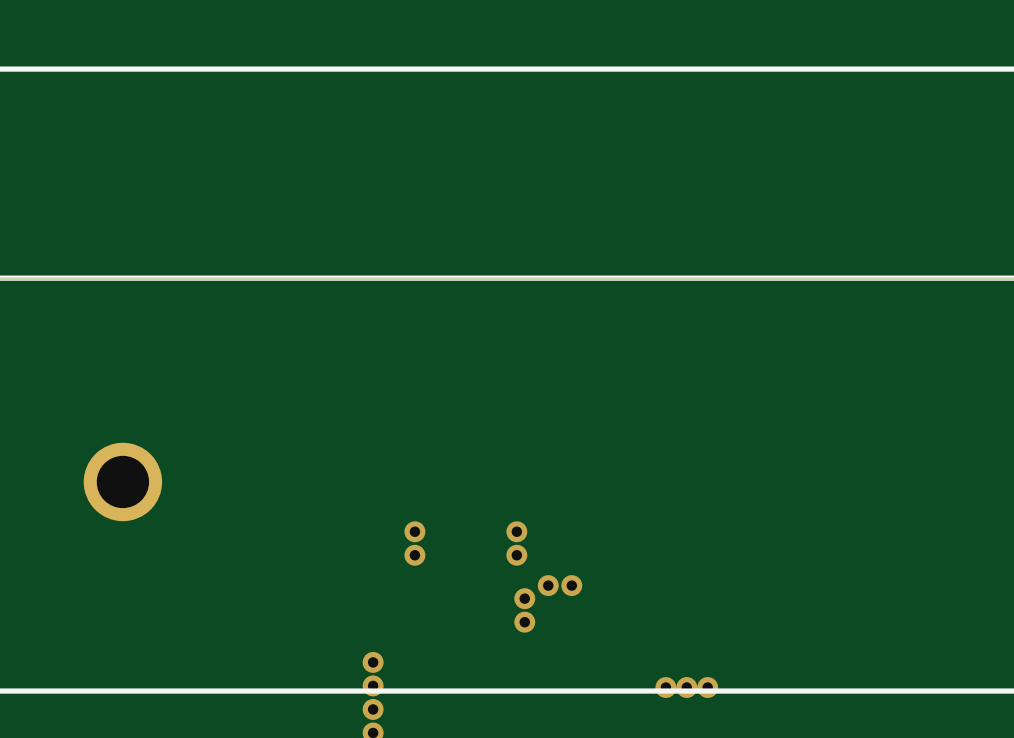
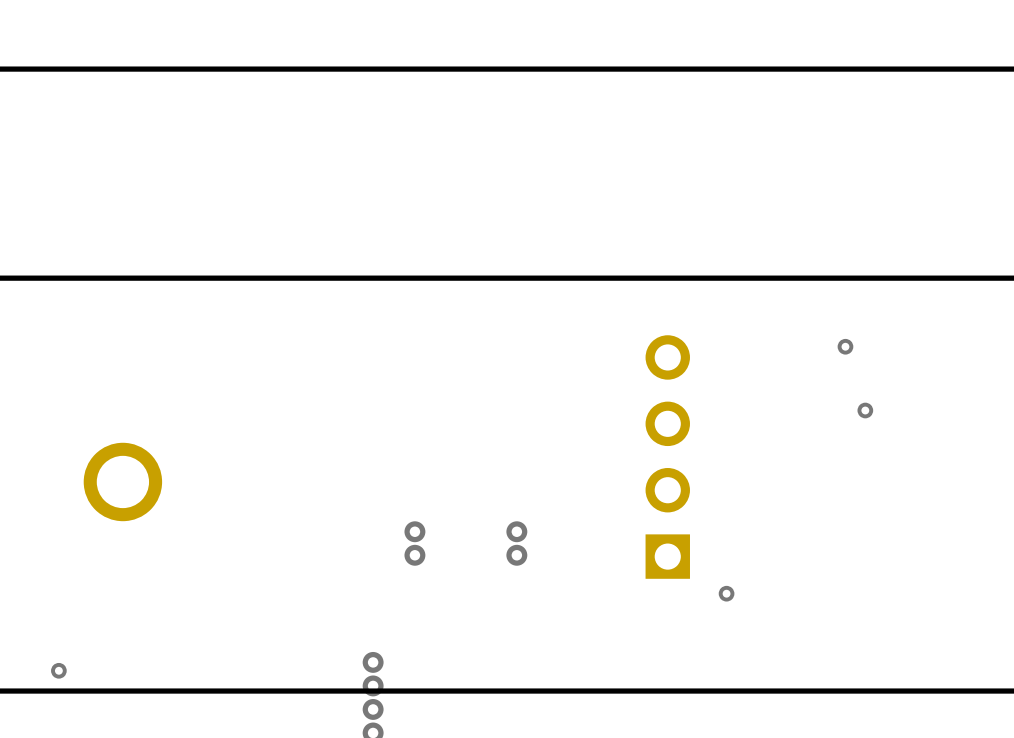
via: none -> (845, 346)
via: none -> (865, 410)
part: none -> (667, 457)
via: (548, 585) -> none
via: (571, 585) -> none
via: none -> (726, 593)
via: (524, 598) -> none
via: (524, 622) -> none
via: none -> (58, 670)
via: (665, 687) -> none
via: (686, 687) -> none
via: (707, 687) -> none

